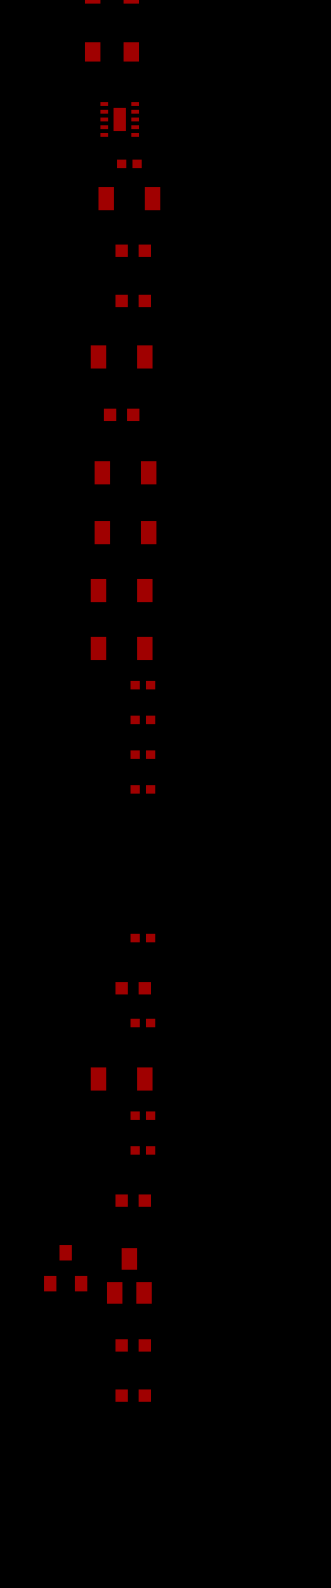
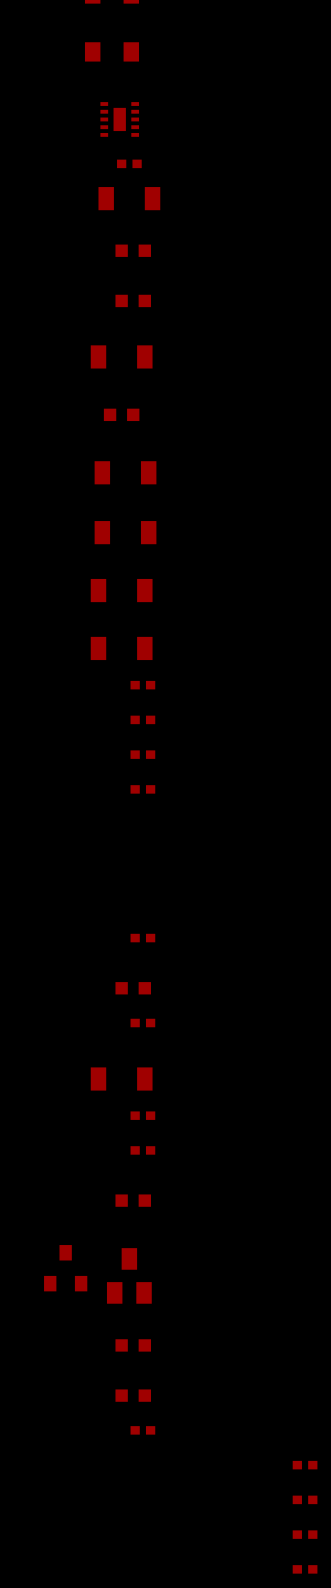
part: none -> (142, 1430)
part: none -> (305, 1465)
part: none -> (305, 1499)
part: none -> (305, 1534)
part: none -> (305, 1569)

